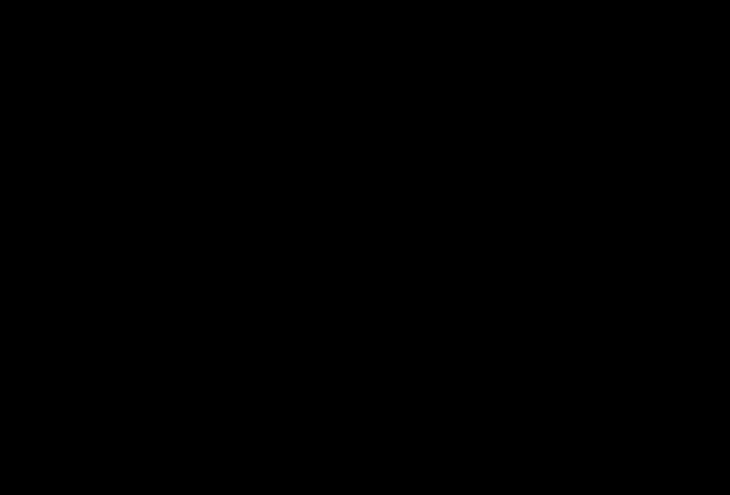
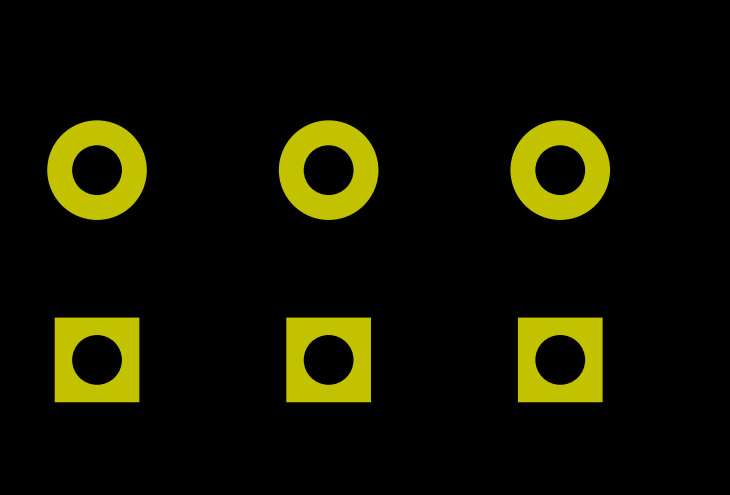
part: none -> (97, 261)
part: none -> (328, 261)
part: none -> (560, 261)

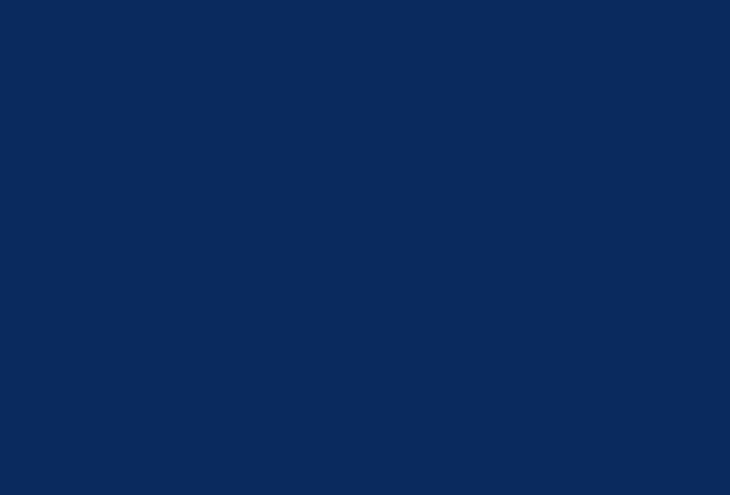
part: (97, 261) -> none
part: (328, 261) -> none
part: (560, 261) -> none

